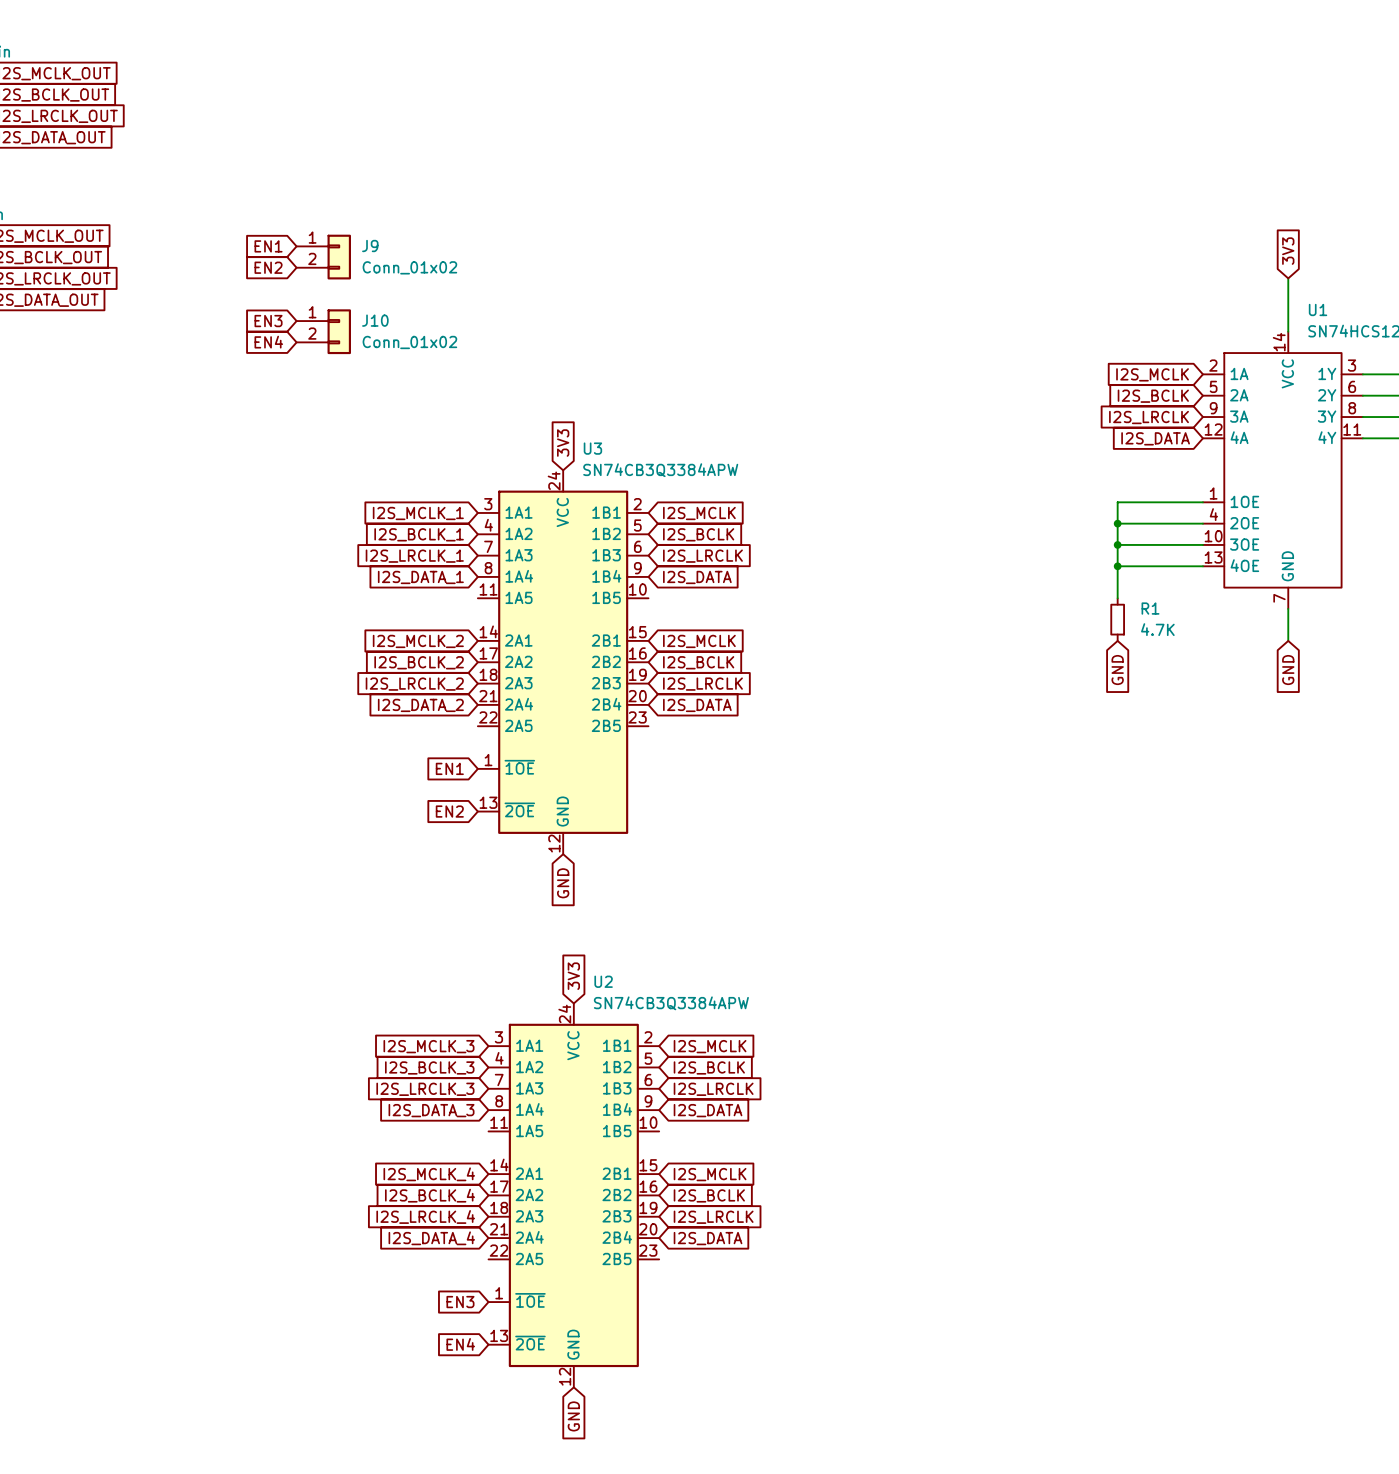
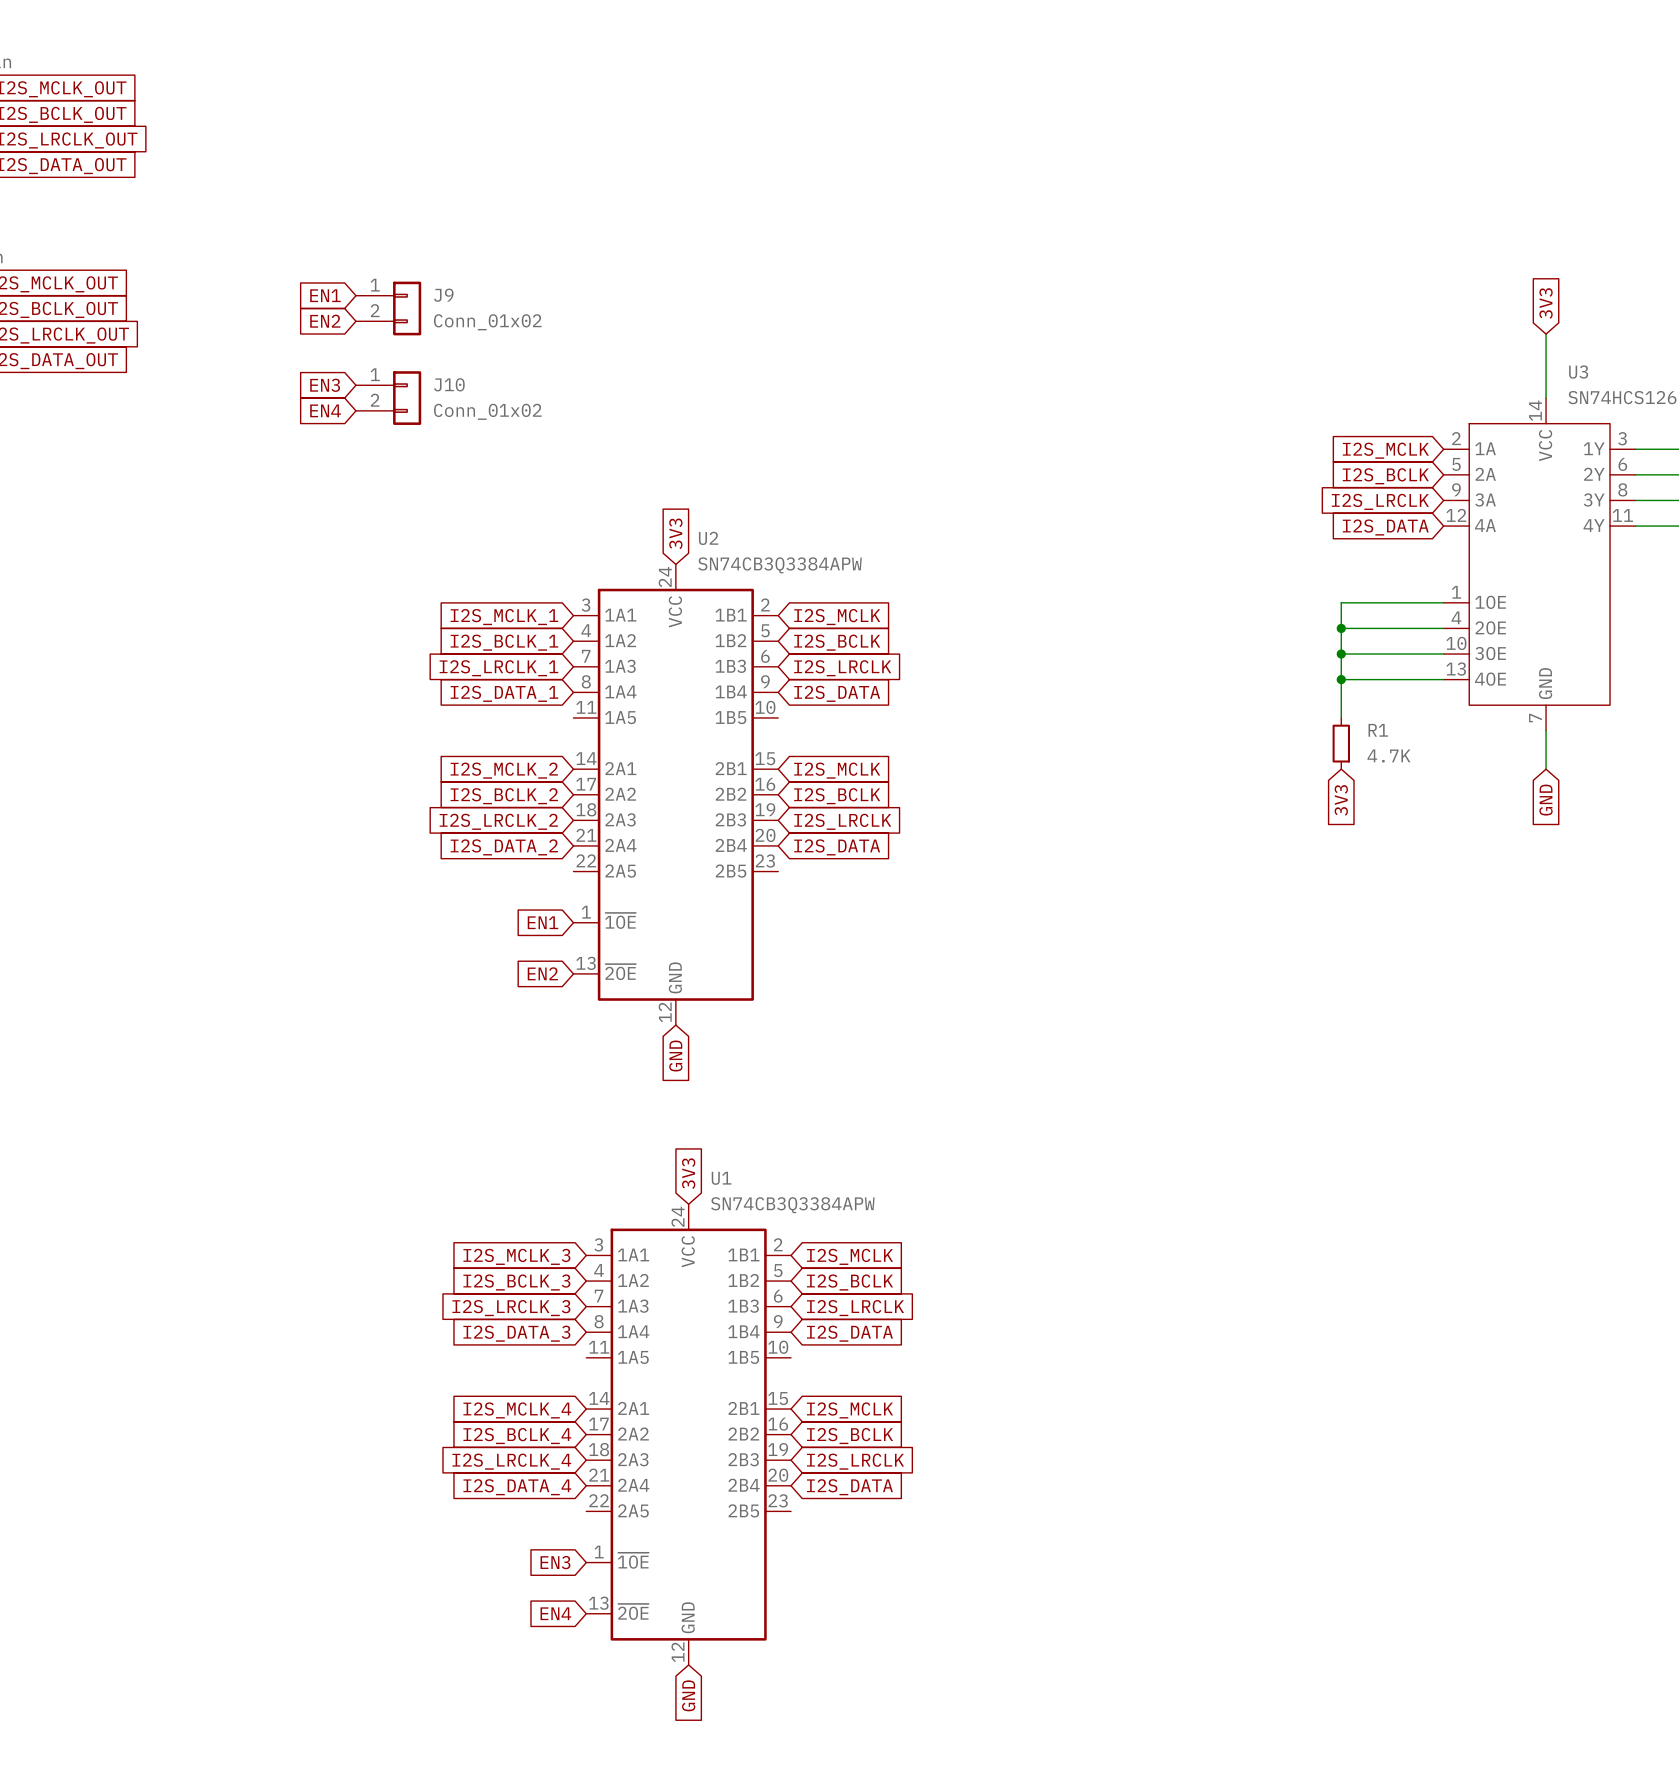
U1 name: U1 (1318, 309) -> U3 (1578, 372)
U3 name: U3 (592, 448) -> U2 (708, 538)
global label: GND (1117, 670) -> 3V3 (1341, 800)
U2 name: U2 (603, 981) -> U1 (721, 1178)

